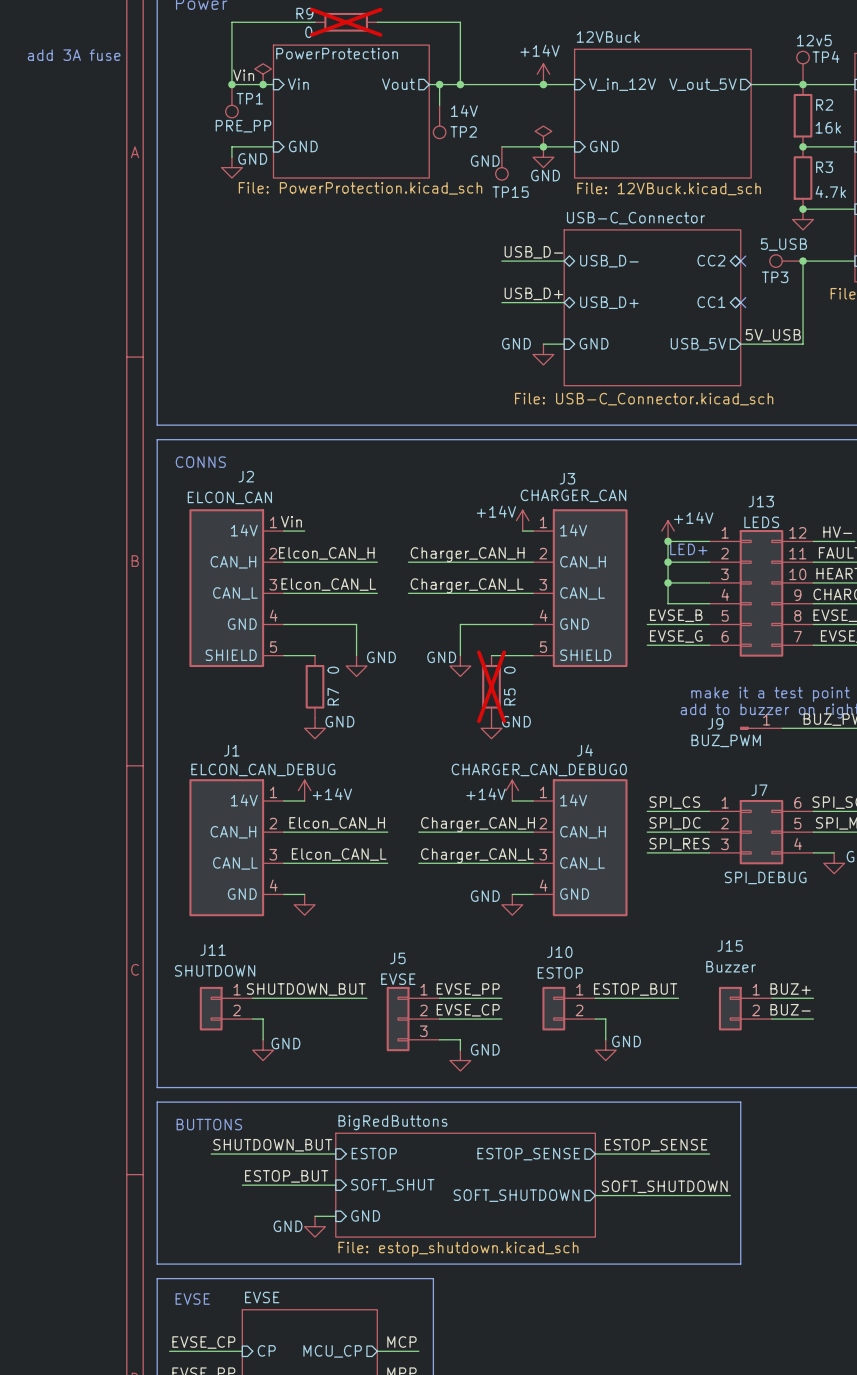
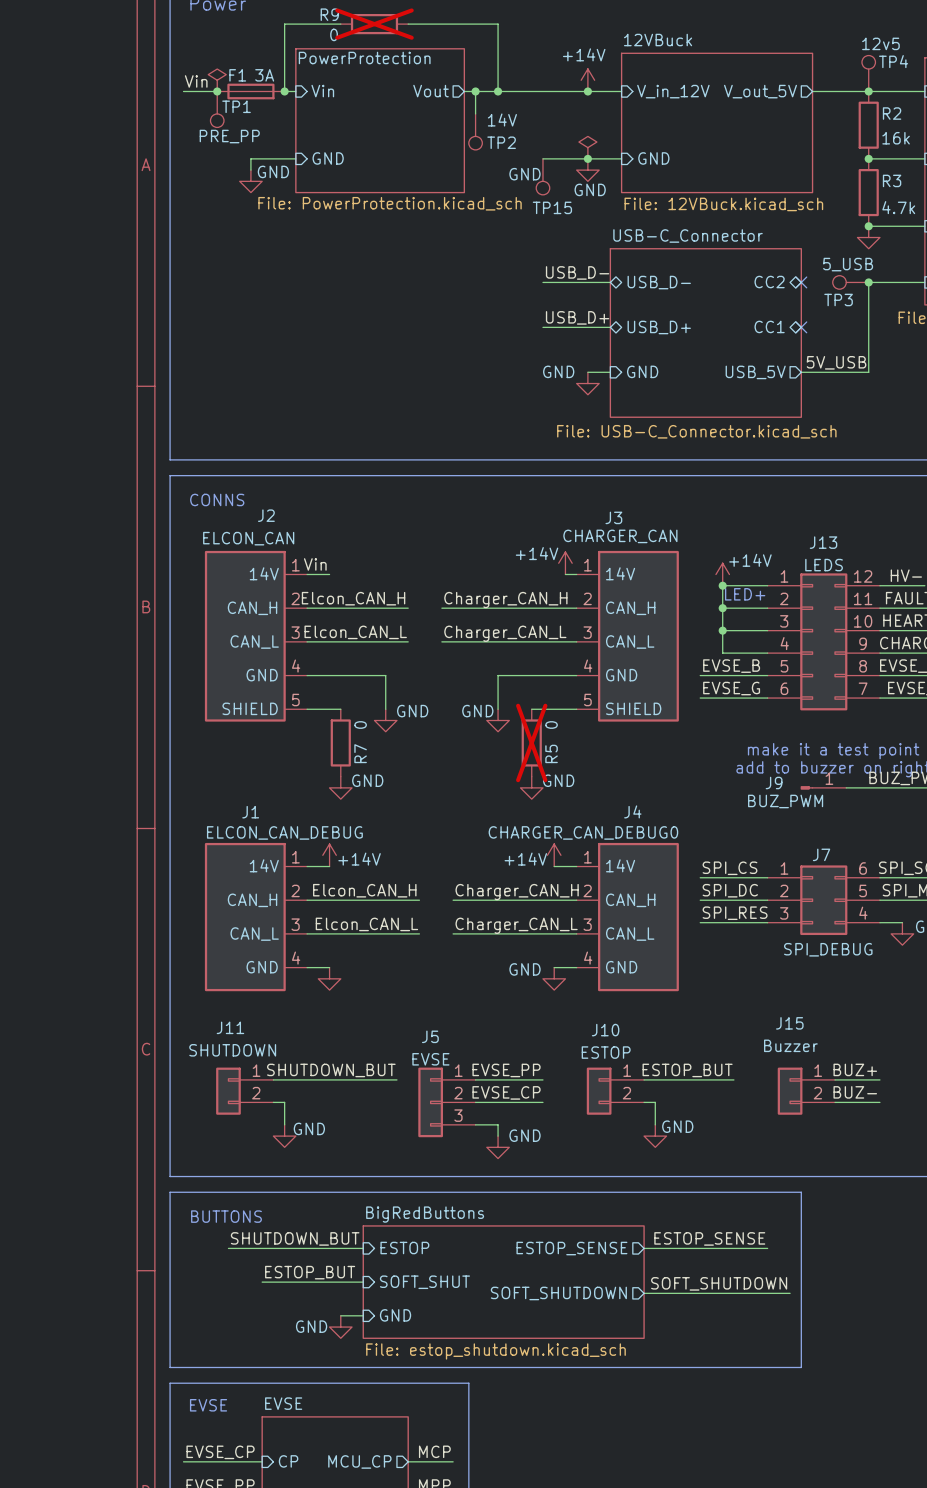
wire: (263, 22) (231, 22) (231, 84) (263, 84) -> (284, 24) (284, 91)
text: add 3A fuse (74, 55) -> none
power symbol position: (263, 74) -> (217, 80)
label position: Vin (243, 75) -> Vin (196, 81)
wire: none -> (183, 91) (217, 91)
junction position: (231, 84) -> (217, 91)
F1: none -> 3A (250, 91)
TP1 position: (231, 101) -> (217, 109)

